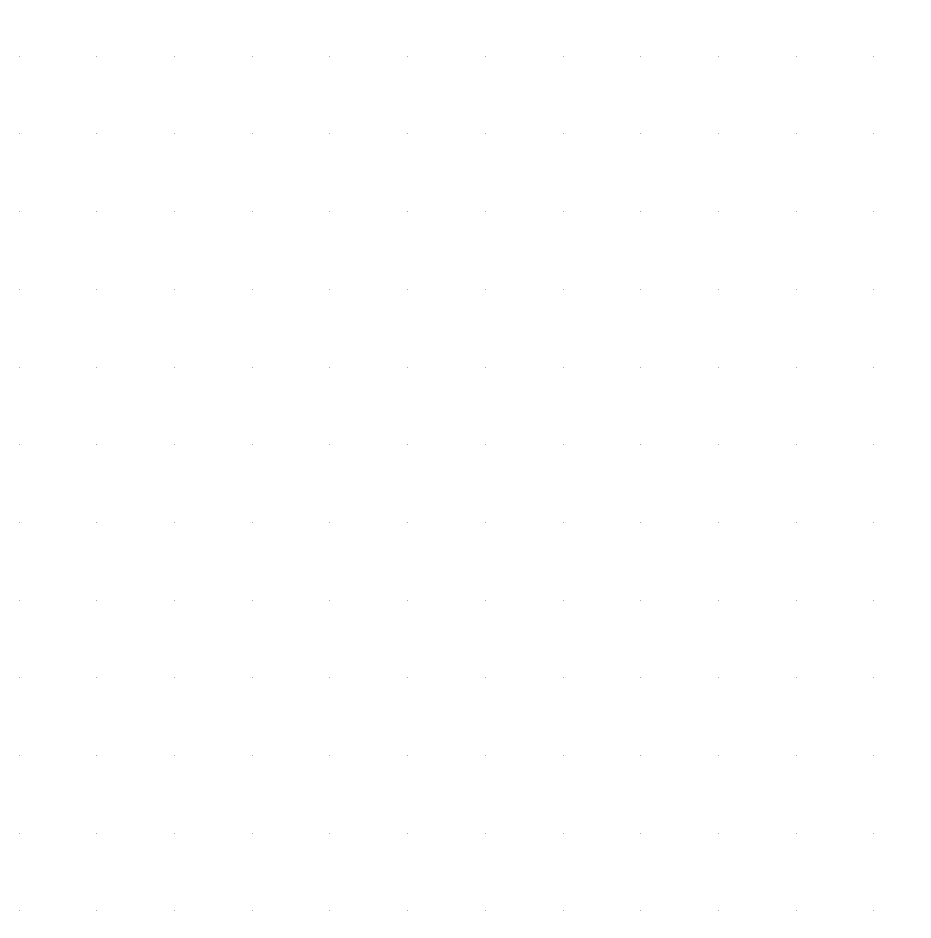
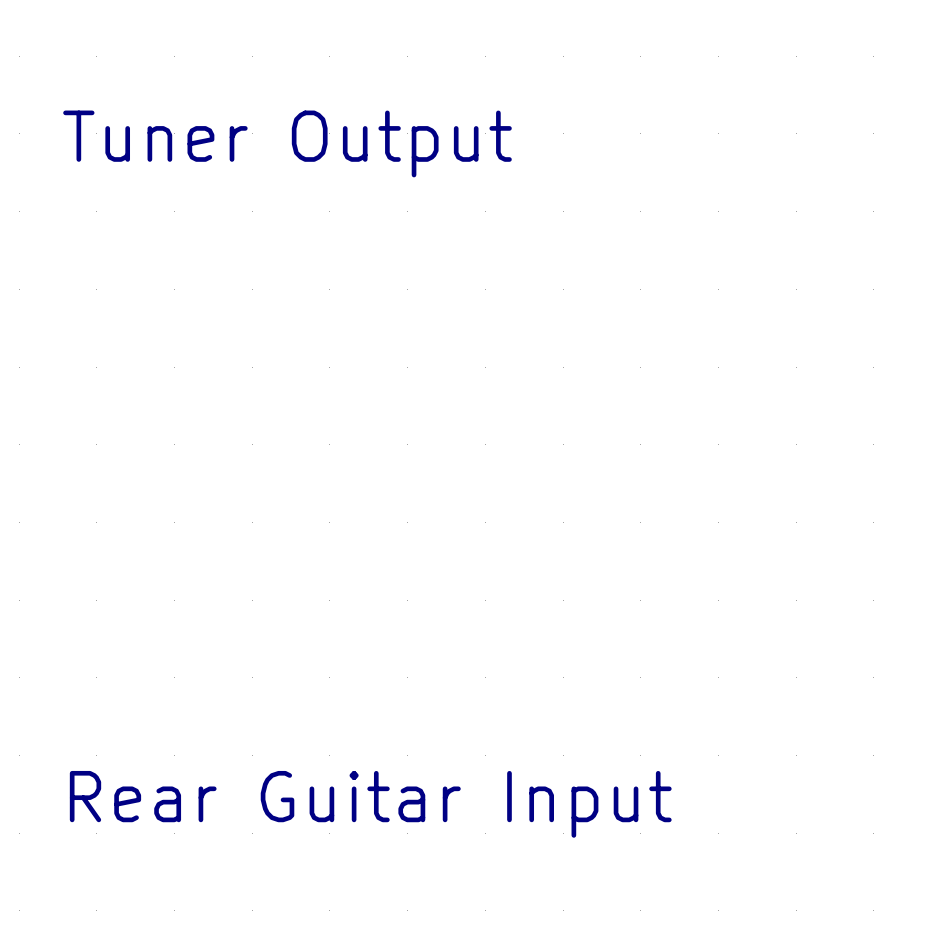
text: none -> Tuner Output (287, 143)
text: none -> Rear Guitar Input (370, 804)

